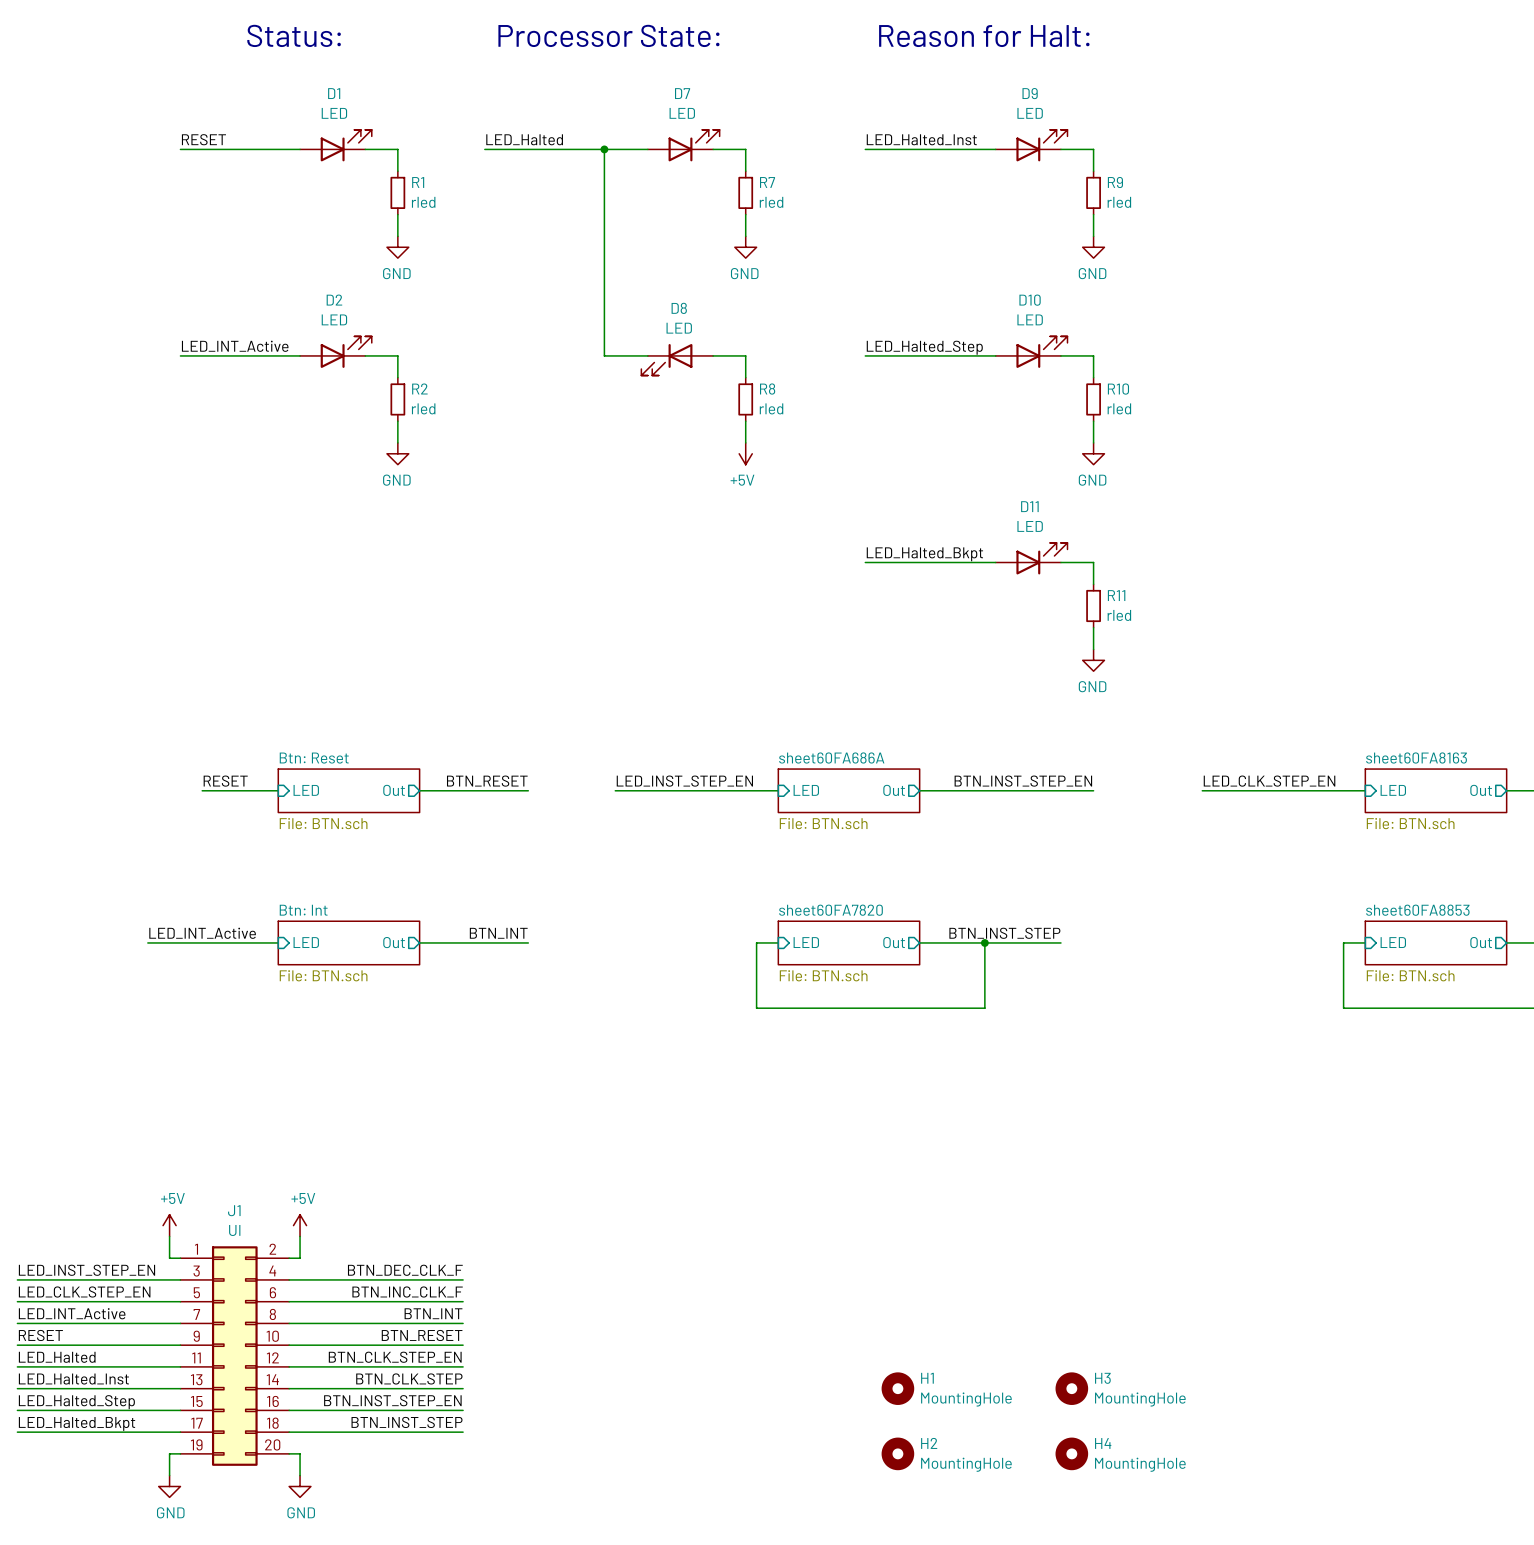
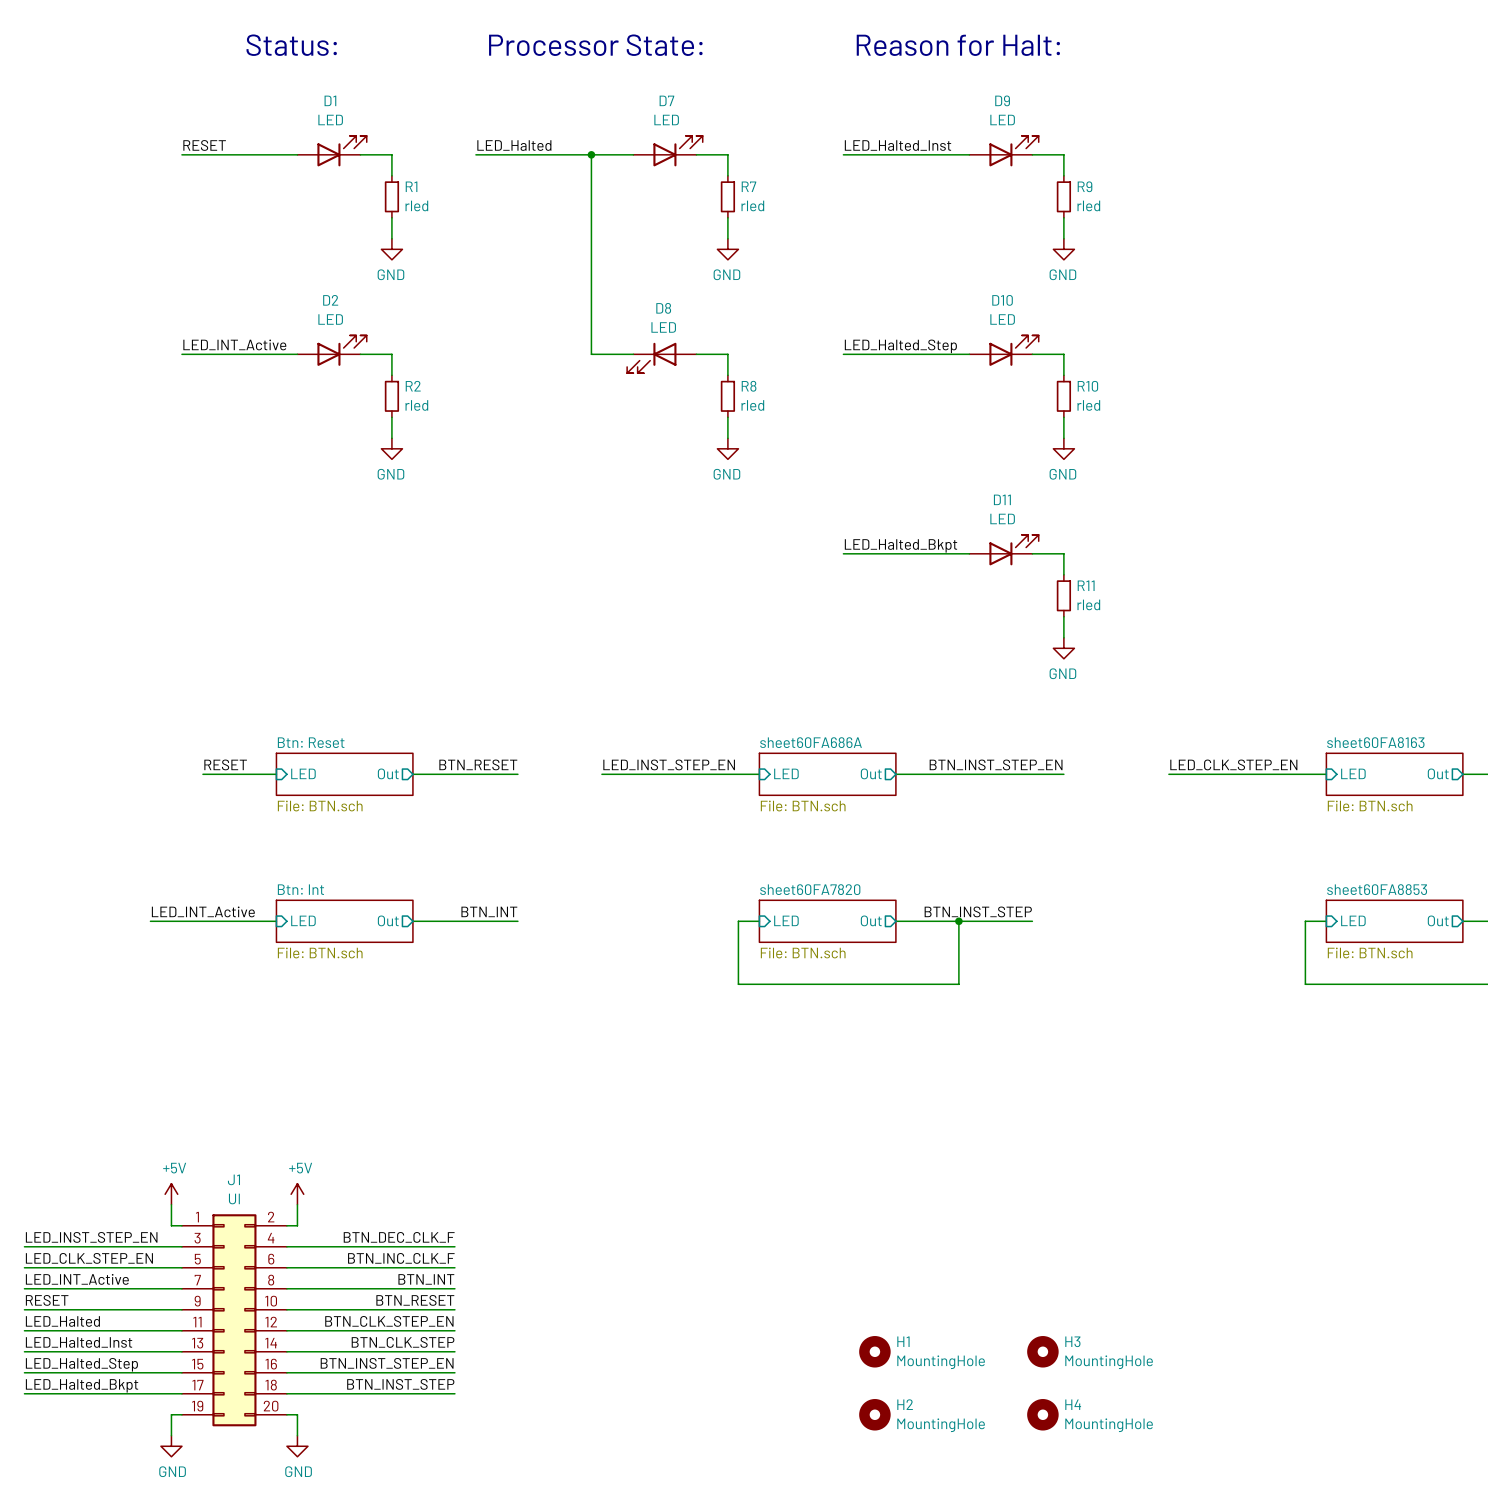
power symbol: +5V (745, 453) -> GND (727, 448)

